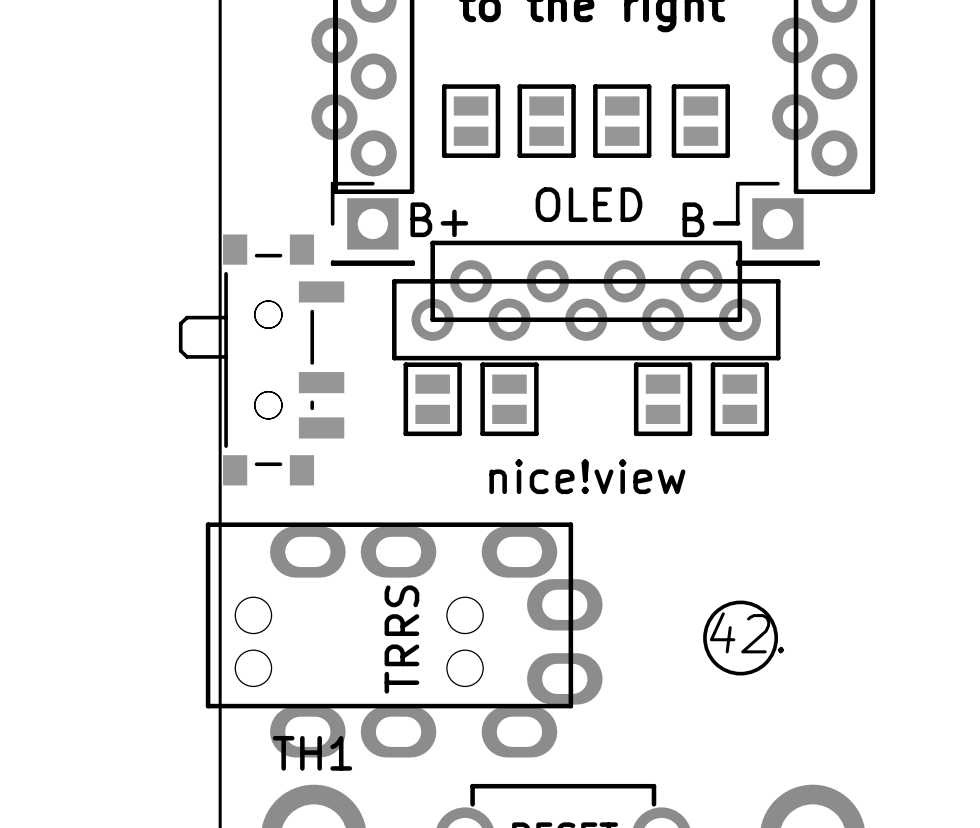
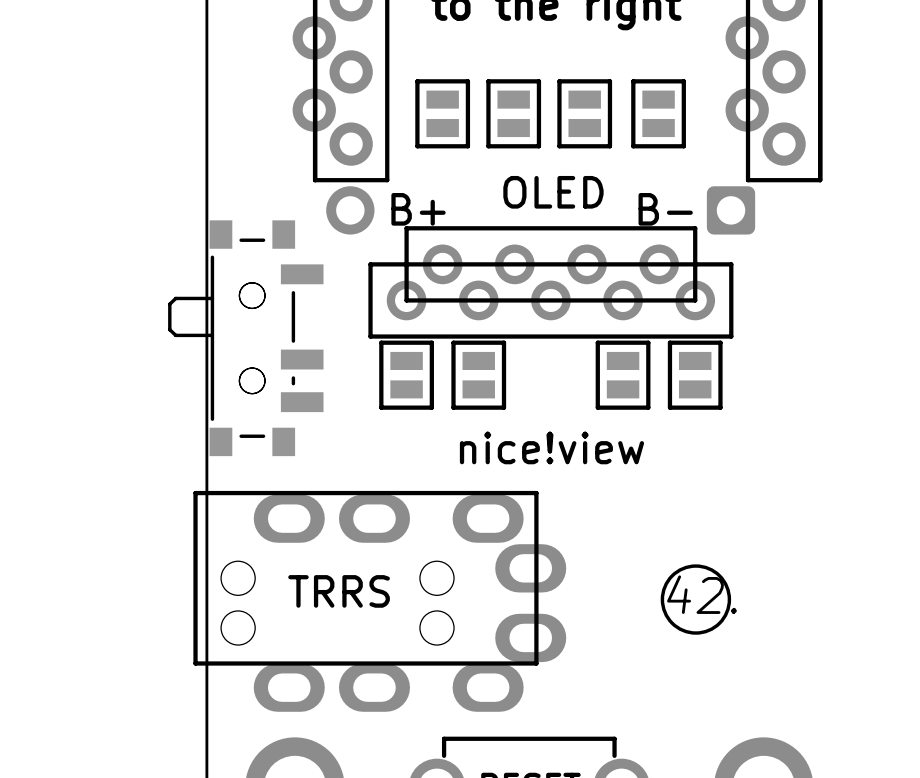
part footprint: [330, 181, 415, 266] -> [326, 186, 375, 235]
part footprint: [735, 181, 820, 266] -> [706, 186, 756, 235]
part value: B+ (439, 219) -> none
part value: B- (711, 219) -> none
part text: none -> B+ (418, 209)
part text: none -> B- (665, 209)
part text rotation: 0° (401, 639) -> 90° clockwise (339, 591)
TH1 name: TH1 (312, 753) -> none

